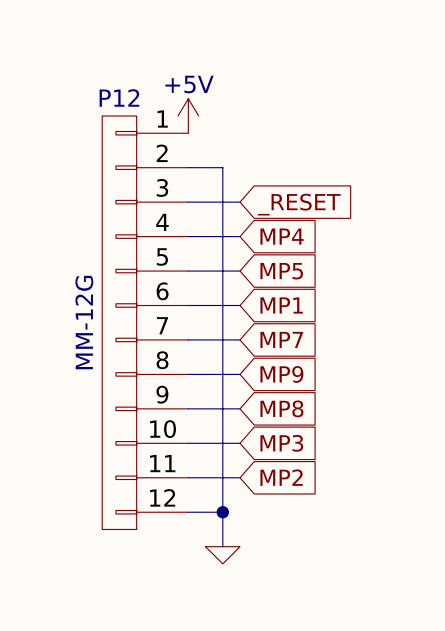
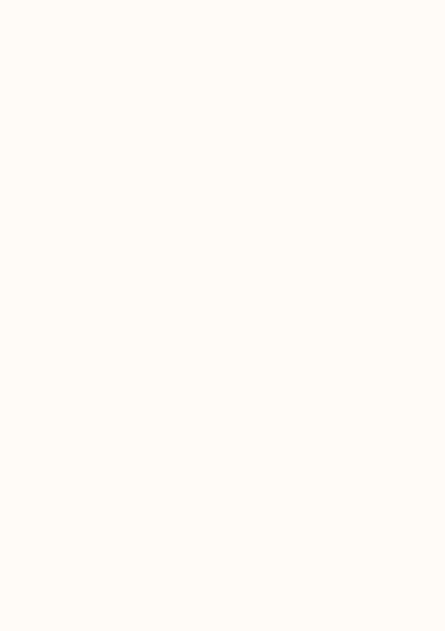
power symbol: +5V (188, 116) -> none
wire: (188, 167) (222, 167) (222, 546) -> none
wire: (188, 202) (240, 202) -> none
global label: _RESET (299, 204) -> none
wire: (188, 236) (240, 236) -> none
global label: MP4 (282, 236) -> none
wire: (188, 271) (240, 271) -> none
global label: MP5 (281, 271) -> none
wire: (188, 305) (240, 305) -> none
global label: MP1 (281, 305) -> none
P12: MM-12G (145, 322) -> none
wire: (188, 339) (240, 339) -> none
global label: MP7 (281, 339) -> none
wire: (188, 374) (240, 374) -> none
global label: MP9 (281, 374) -> none
wire: (188, 408) (240, 408) -> none
global label: MP8 (281, 408) -> none
wire: (188, 443) (240, 443) -> none
global label: MP3 (281, 443) -> none
wire: (188, 477) (240, 477) -> none
global label: MP2 (281, 477) -> none
wire: (188, 512) (222, 512) -> none
junction: (222, 512) -> none
power symbol: (222, 555) -> none

